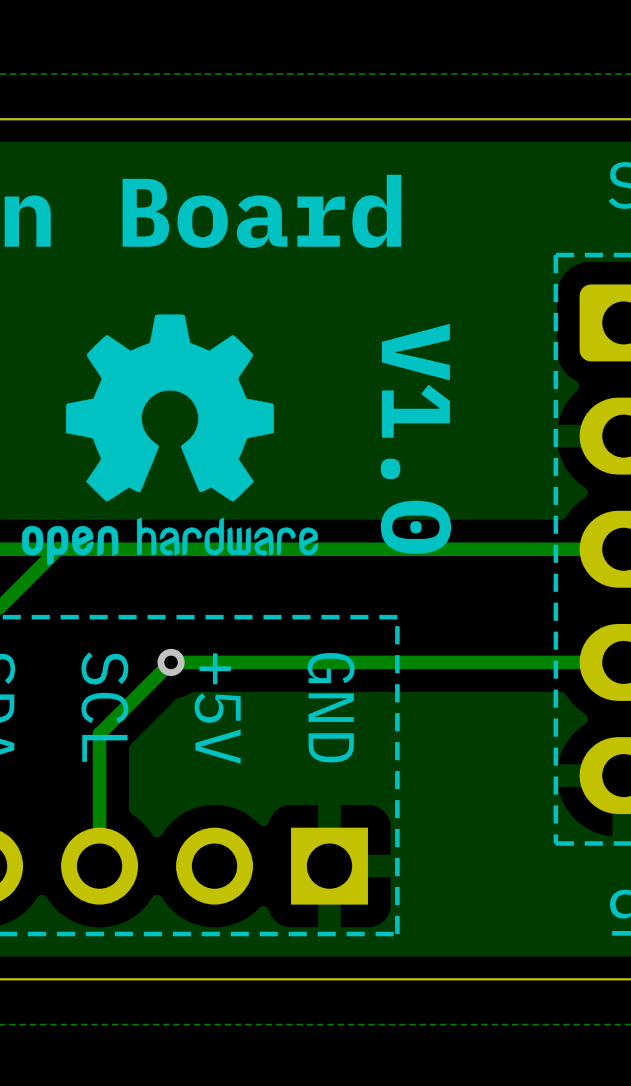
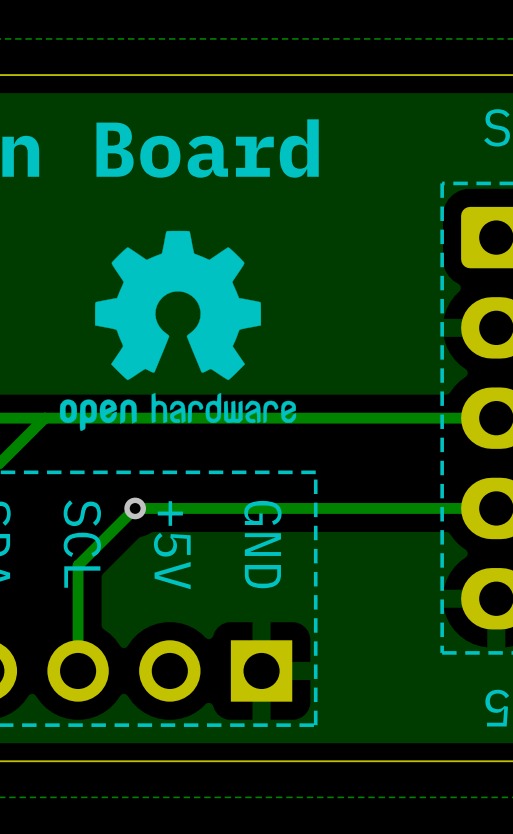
text: V1.0 (415, 438) -> none
drawing position: (169, 439) -> (178, 330)

